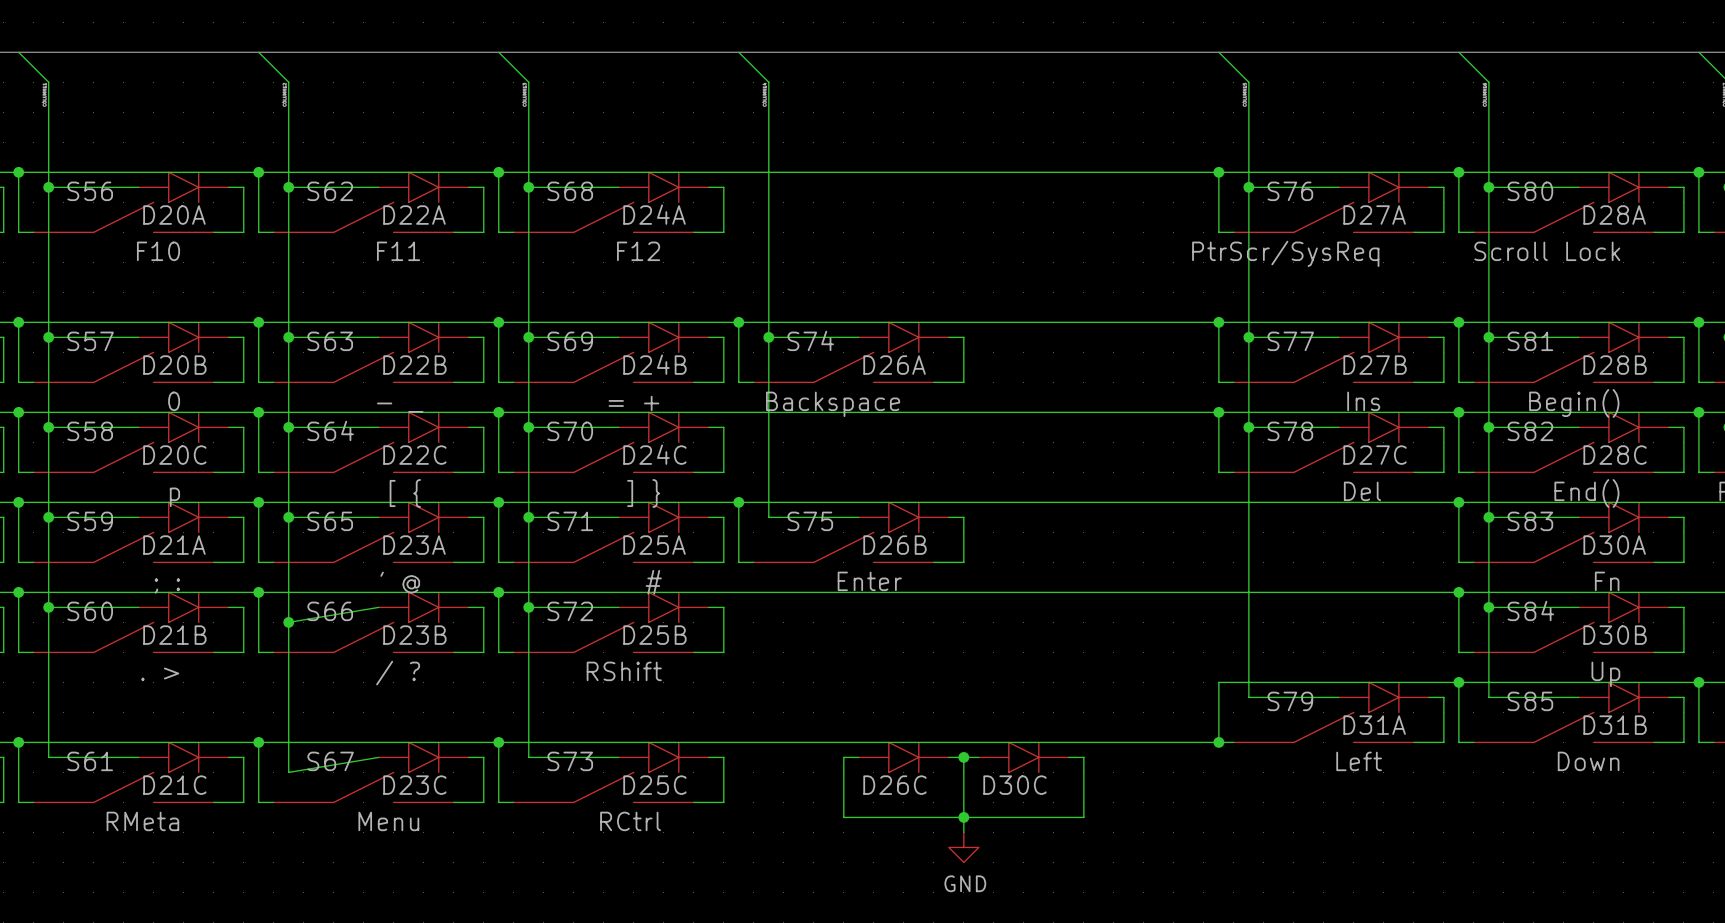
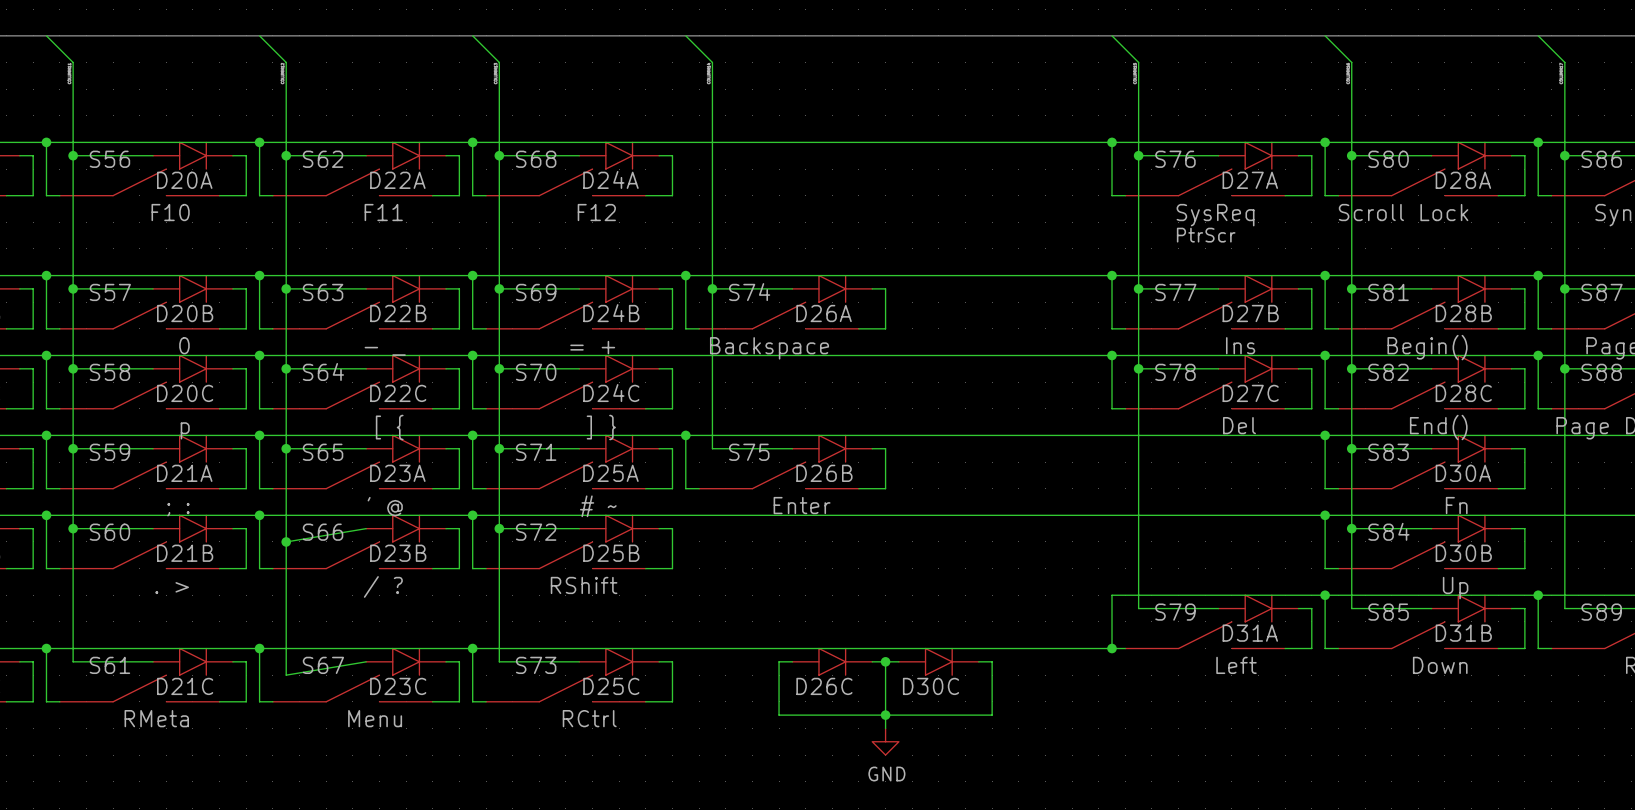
S76 value: PtrScr/SysReq (1285, 253) -> SysReq (1215, 215)
S76 text: none -> PtrScr (1206, 235)
S71 value: # (653, 582) -> # ~ (598, 506)

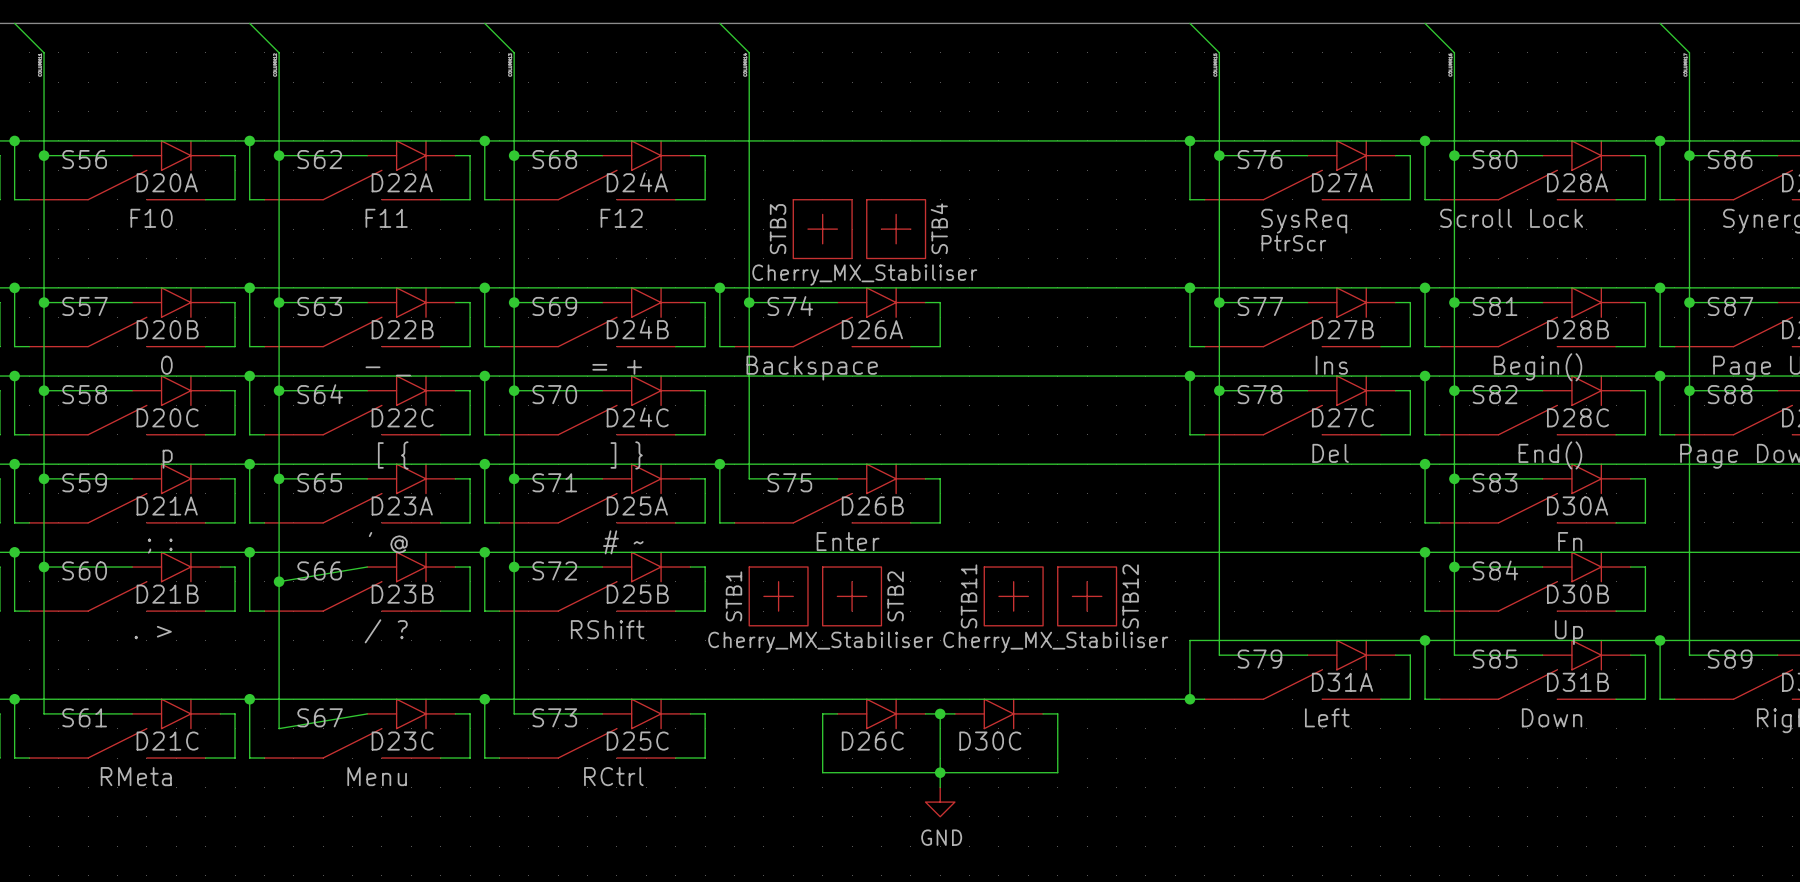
STB3: none -> Cherry_MX_Stabiliser (822, 229)
STB4: none -> (896, 229)
STB1: none -> Cherry_MX_Stabiliser (778, 596)
STB2: none -> (852, 596)
STB11: none -> Cherry_MX_Stabiliser (1013, 596)
STB12: none -> (1087, 596)

